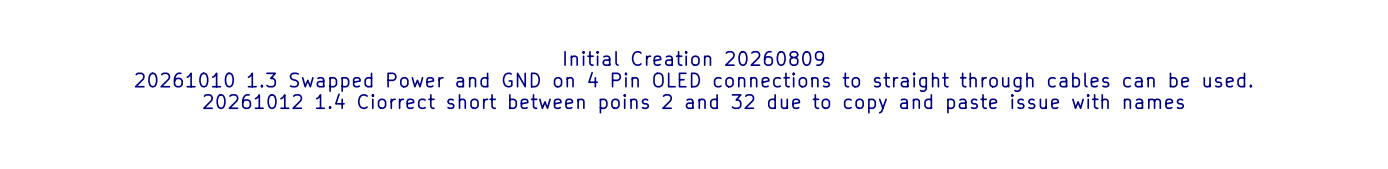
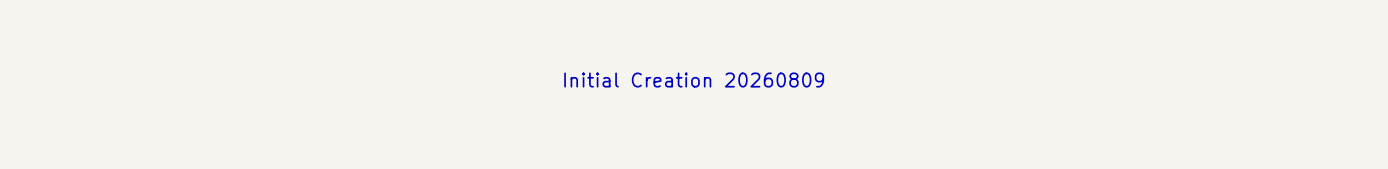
text: Initial Creation 20260809 (694, 58) -> none
text: 20261010 1.3 Swapped Power and GND on 4 Pin OLED connections to straight through cables can be used. (693, 81) -> Initial Creation 20260809 (694, 80)
text: 20261012 1.4 Ciorrect short between poins 2 and 32 due to copy and paste issue with names (693, 103) -> none

